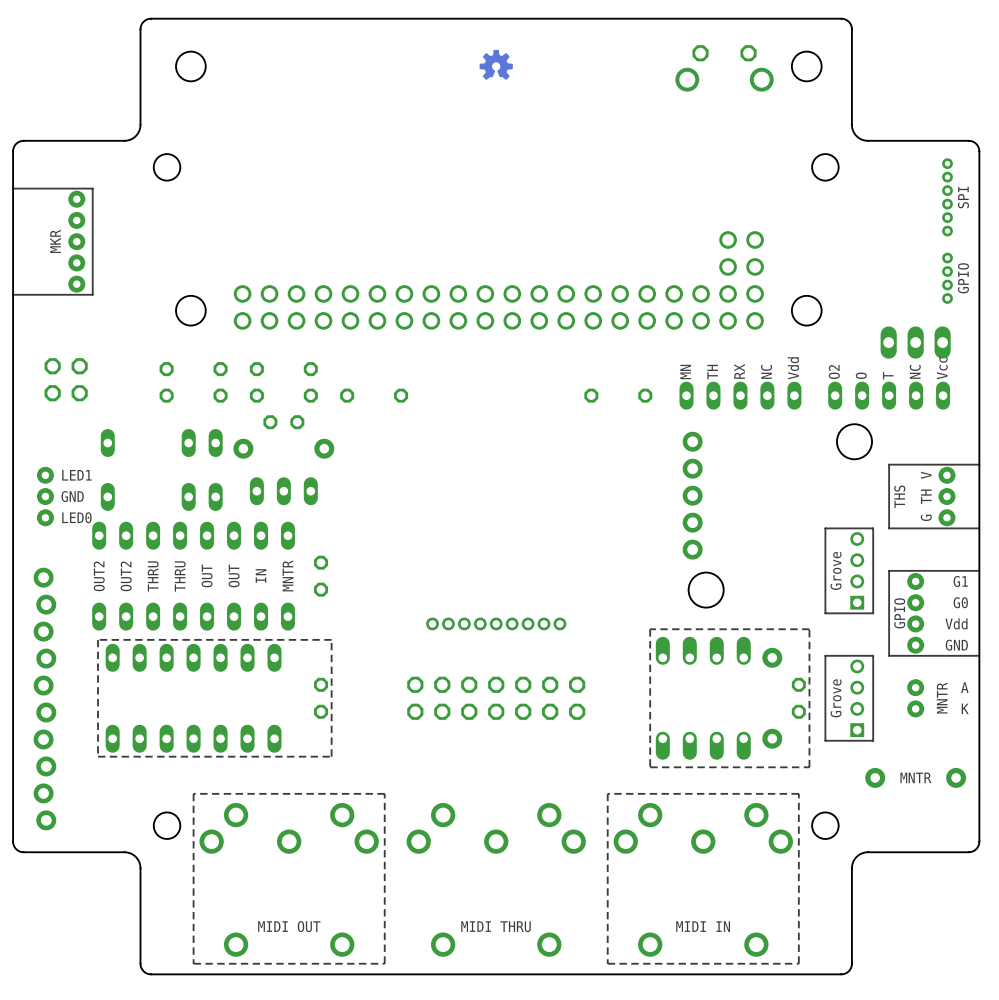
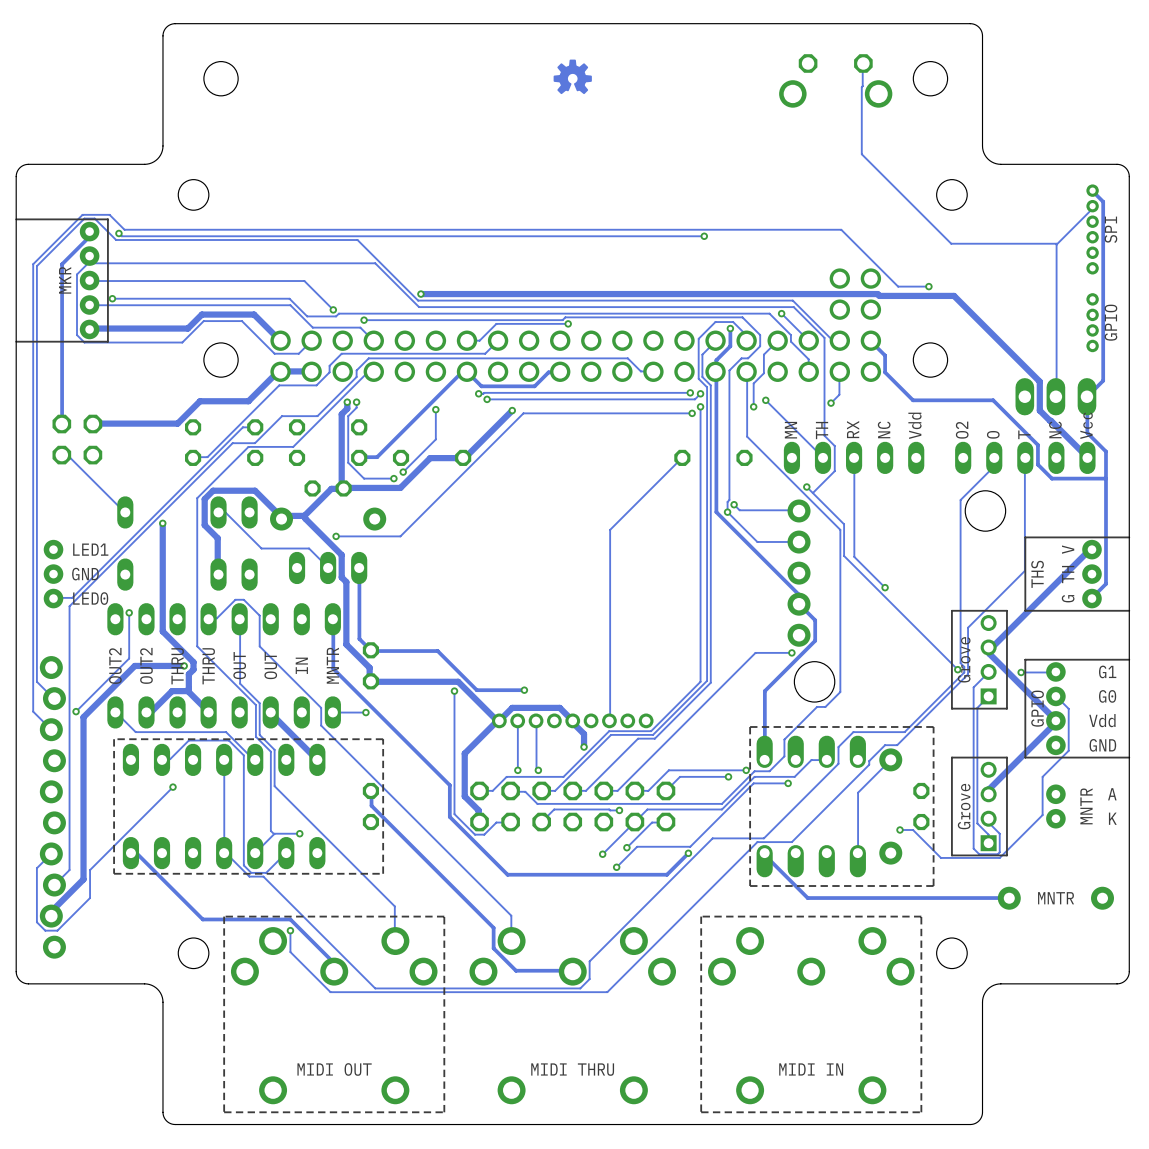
track: none -> (863, 63) (861, 154) (951, 243) (1057, 244)
track: none -> (1092, 190) (1103, 201) (1103, 380) (1086, 396) (1087, 432) (1105, 451) (1105, 583) (1091, 598)
track: none -> (1092, 206) (1092, 209) (1056, 244) (1055, 396)
track: none -> (89, 231) (89, 237) (62, 264) (61, 424)
track: none -> (118, 233) (121, 236) (704, 236)
via: none -> (118, 233)
via: none -> (704, 236)
track: none -> (89, 280) (304, 281) (333, 309)
track: none -> (928, 286) (898, 286) (841, 229) (124, 229) (109, 214) (82, 214) (33, 264) (33, 711) (51, 729)
via: none -> (928, 286)
track: none -> (420, 294) (877, 294) (879, 295) (954, 295) (1039, 381) (1039, 410) (1087, 457)
via: none -> (420, 294)
track: none -> (112, 298) (289, 298) (307, 316) (336, 316) (338, 313) (769, 313) (790, 335) (790, 341) (808, 359) (808, 371)
via: none -> (112, 298)
track: none -> (89, 305) (290, 305) (312, 327) (360, 327) (373, 340)
via: none -> (333, 309)
track: none -> (781, 313) (808, 340)
via: none -> (781, 313)
track: none -> (364, 320) (742, 317) (760, 335) (760, 346) (748, 358) (741, 358) (729, 370) (729, 500) (727, 501) (727, 512) (757, 541) (799, 542)
via: none -> (364, 320)
track: none -> (568, 323) (496, 323) (479, 340) (467, 340)
via: none -> (568, 323)
track: none -> (730, 328) (730, 346) (716, 360) (716, 512) (798, 594) (799, 604) (815, 620) (815, 640) (764, 691) (764, 759)
via: none -> (730, 328)
track: none -> (89, 329) (187, 328) (201, 314) (254, 314) (280, 340)
track: none -> (311, 340) (298, 353) (274, 353) (241, 321) (203, 321) (182, 342) (84, 342) (77, 335) (77, 274) (89, 262) (89, 256) (89, 263) (375, 263) (419, 307) (793, 307) (824, 337) (824, 435) (834, 445) (834, 471) (812, 493)
track: none -> (498, 340) (485, 353) (341, 353) (329, 365) (329, 372) (316, 385) (279, 385) (207, 457) (193, 457)
track: none -> (715, 340) (702, 354) (702, 377) (710, 385) (710, 682) (654, 738) (638, 738) (585, 790) (572, 790)
track: none -> (746, 340) (746, 335) (733, 322) (715, 322) (698, 338) (698, 378) (707, 387) (707, 680) (653, 734) (611, 734) (555, 790) (541, 790)
track: none -> (777, 340) (763, 354) (763, 373) (753, 383) (753, 406)
track: none -> (839, 340) (832, 340) (792, 300) (418, 300) (357, 240) (116, 240) (94, 218) (84, 218) (36, 266) (36, 681) (54, 698)
track: none -> (870, 340) (885, 355) (885, 372) (913, 400) (993, 400) (1037, 445) (1037, 464) (1051, 478) (1105, 478)
track: none -> (311, 371) (277, 372) (248, 401) (200, 401) (177, 423) (92, 424)
track: none -> (373, 371) (367, 372) (293, 446) (248, 446) (197, 498) (197, 646) (255, 705) (255, 736) (270, 751) (270, 830) (274, 834)
track: none -> (560, 371) (548, 372) (534, 386) (481, 386) (467, 371) (461, 372) (377, 457) (359, 457)
track: none -> (653, 371) (640, 371) (627, 358) (368, 358) (356, 370) (356, 377) (317, 416) (282, 416) (255, 443) (232, 443) (69, 606) (69, 870) (54, 884)
track: none -> (746, 371) (747, 436) (840, 529) (840, 692) (825, 706) (817, 706) (784, 739) (784, 756) (769, 771) (754, 771) (721, 803) (537, 803) (525, 791) (510, 790)
track: none -> (839, 371) (839, 394) (831, 403)
track: none -> (690, 392) (478, 393)
via: none -> (690, 392)
via: none -> (478, 393)
track: none -> (700, 393) (694, 399) (487, 399)
via: none -> (700, 393)
via: none -> (487, 399)
track: none -> (765, 400) (823, 457)
via: none -> (765, 400)
track: none -> (347, 402) (347, 408) (341, 414) (341, 486) (343, 488)
via: none -> (347, 402)
track: none -> (356, 402) (356, 407) (348, 416) (348, 462) (364, 478) (393, 478)
via: none -> (356, 402)
via: none -> (831, 403)
track: none -> (700, 406) (700, 681) (651, 731) (609, 731) (563, 776) (506, 776) (492, 790) (479, 790)
via: none -> (700, 406)
via: none -> (753, 406)
track: none -> (435, 409) (435, 439) (403, 472)
via: none -> (435, 409)
track: none -> (512, 410) (465, 457) (430, 458) (400, 487) (343, 488)
via: none -> (512, 410)
track: none -> (692, 413) (523, 413) (400, 536) (336, 536)
via: none -> (692, 413)
track: none -> (255, 427) (242, 427) (72, 597) (53, 598)
track: none -> (61, 455) (67, 455) (125, 512)
track: none -> (682, 457) (610, 529) (609, 720)
track: none -> (854, 457) (854, 556) (885, 587)
track: none -> (994, 458) (994, 466) (960, 500) (960, 663) (964, 666) (964, 672) (904, 732) (853, 732) (838, 747) (838, 763) (763, 838) (712, 838) (589, 961) (589, 979) (580, 988) (375, 988) (263, 876) (249, 876) (224, 853) (224, 760)
track: none -> (1025, 457) (1024, 570) (968, 627) (968, 674) (897, 745) (885, 745) (869, 761) (869, 764) (791, 842) (757, 842) (607, 992) (330, 992) (290, 952) (290, 930)
via: none -> (403, 472)
via: none -> (393, 478)
track: none -> (806, 486) (844, 524) (844, 555) (957, 669)
via: none -> (806, 486)
track: none -> (343, 488) (331, 488) (304, 515)
track: none -> (734, 504) (739, 510) (799, 510)
via: none -> (734, 504)
via: none -> (727, 512)
track: none -> (218, 512) (226, 513) (261, 548) (309, 548) (328, 567)
track: none -> (304, 515) (283, 515) (281, 519) (255, 490) (213, 490) (204, 499) (204, 525) (217, 538) (218, 574)
track: none -> (304, 515) (341, 555) (341, 577) (346, 582) (346, 644) (369, 667) (370, 681) (458, 681) (499, 720)
track: none -> (162, 523) (162, 631) (193, 662) (193, 669) (188, 674) (187, 691)
via: none -> (162, 523)
via: none -> (336, 536)
track: none -> (1091, 549) (992, 647) (988, 647) (989, 653) (1055, 720) (989, 788) (988, 794)
track: none -> (359, 567) (359, 638) (371, 651) (437, 651) (476, 690) (524, 690)
via: none -> (885, 587)
track: none -> (129, 612) (129, 658) (76, 711)
via: none -> (129, 612)
track: none -> (208, 619) (216, 618) (235, 599) (243, 599) (259, 615) (259, 646) (321, 707) (321, 725) (511, 915) (511, 941)
track: none -> (239, 619) (240, 683) (259, 703) (259, 734) (274, 749) (274, 786) (394, 906) (395, 941)
track: none -> (332, 619) (333, 668) (449, 785) (449, 816) (507, 874) (666, 874) (688, 853)
track: none -> (791, 652) (755, 652) (617, 790) (603, 790)
via: none -> (791, 652)
track: none -> (184, 665) (134, 665) (83, 717) (83, 879) (51, 911) (51, 916)
via: none -> (184, 665)
via: none -> (957, 669)
track: none -> (988, 671) (973, 687) (973, 848) (979, 854) (997, 854) (999, 852) (999, 833) (989, 823) (988, 818)
via: none -> (1021, 672)
track: none -> (1055, 671) (1021, 672)
via: none -> (524, 690)
track: none -> (187, 691) (172, 691) (151, 711) (146, 712)
track: none -> (187, 691) (208, 712)
track: none -> (454, 691) (454, 814) (474, 834) (484, 834) (496, 822) (510, 822)
via: none -> (454, 691)
track: none -> (988, 696) (977, 707) (977, 823) (988, 834) (988, 843)
track: none -> (1055, 696) (1068, 708) (1068, 750) (1042, 776) (1042, 815) (999, 857) (941, 857) (913, 829) (900, 829)
via: none -> (76, 711)
track: none -> (115, 712) (135, 732) (226, 732) (255, 759)
track: none -> (270, 712) (317, 759)
track: none -> (332, 712) (365, 712)
via: none -> (365, 712)
track: none -> (499, 720) (512, 707) (559, 707) (584, 733) (584, 747)
track: none -> (499, 720) (464, 753) (464, 796) (478, 810) (479, 822)
track: none -> (536, 720) (536, 768) (538, 770)
track: none -> (517, 720) (517, 770)
via: none -> (584, 747)
track: none -> (162, 759) (170, 759) (188, 740) (228, 740) (243, 755) (243, 865) (251, 872) (266, 872) (286, 853)
track: none -> (826, 759) (811, 760) (794, 776) (754, 776) (721, 809) (647, 809) (602, 854)
track: none -> (890, 760) (858, 792) (857, 853)
via: none -> (517, 770)
via: none -> (538, 770)
track: none -> (746, 770) (668, 770) (648, 790) (634, 790)
via: none -> (746, 770)
track: none -> (728, 776) (680, 776) (666, 790)
via: none -> (728, 776)
track: none -> (788, 783) (753, 783) (690, 846) (637, 846) (616, 867)
via: none -> (788, 783)
track: none -> (173, 787) (90, 870) (90, 898) (57, 930) (45, 930) (36, 922) (36, 868) (51, 853)
via: none -> (173, 787)
track: none -> (370, 790) (371, 805) (493, 927) (493, 948) (515, 970) (572, 971)
track: none -> (619, 810) (554, 809) (541, 822)
via: none -> (619, 810)
track: none -> (665, 822) (652, 822) (626, 847)
via: none -> (900, 829)
track: none -> (299, 833) (274, 833) (255, 853)
via: none -> (299, 833)
via: none -> (626, 847)
track: none -> (131, 853) (136, 853) (202, 919) (290, 919) (333, 962) (334, 971)
via: none -> (688, 853)
track: none -> (764, 853) (807, 898) (1009, 898)
via: none -> (602, 854)
via: none -> (616, 867)
via: none -> (290, 930)

